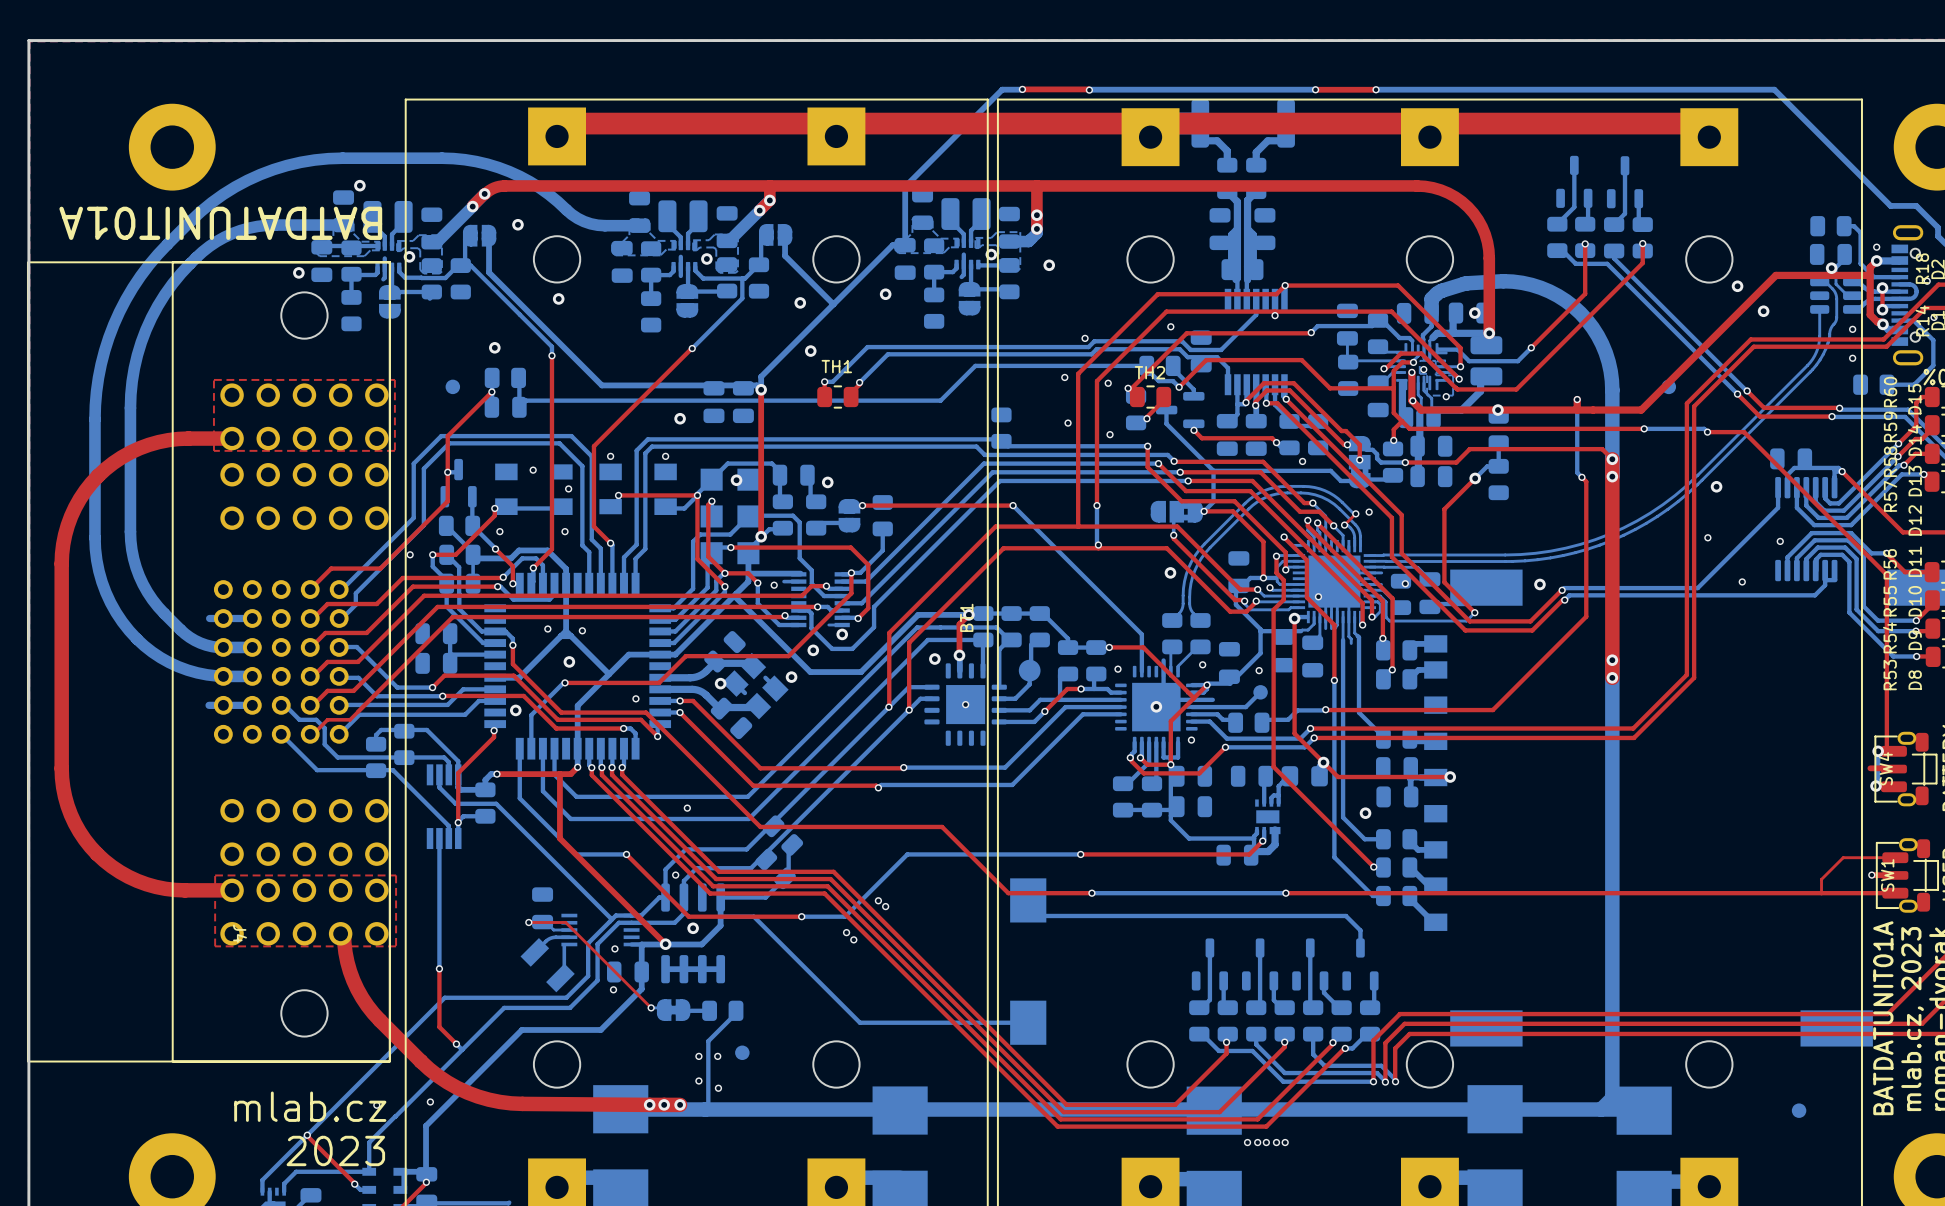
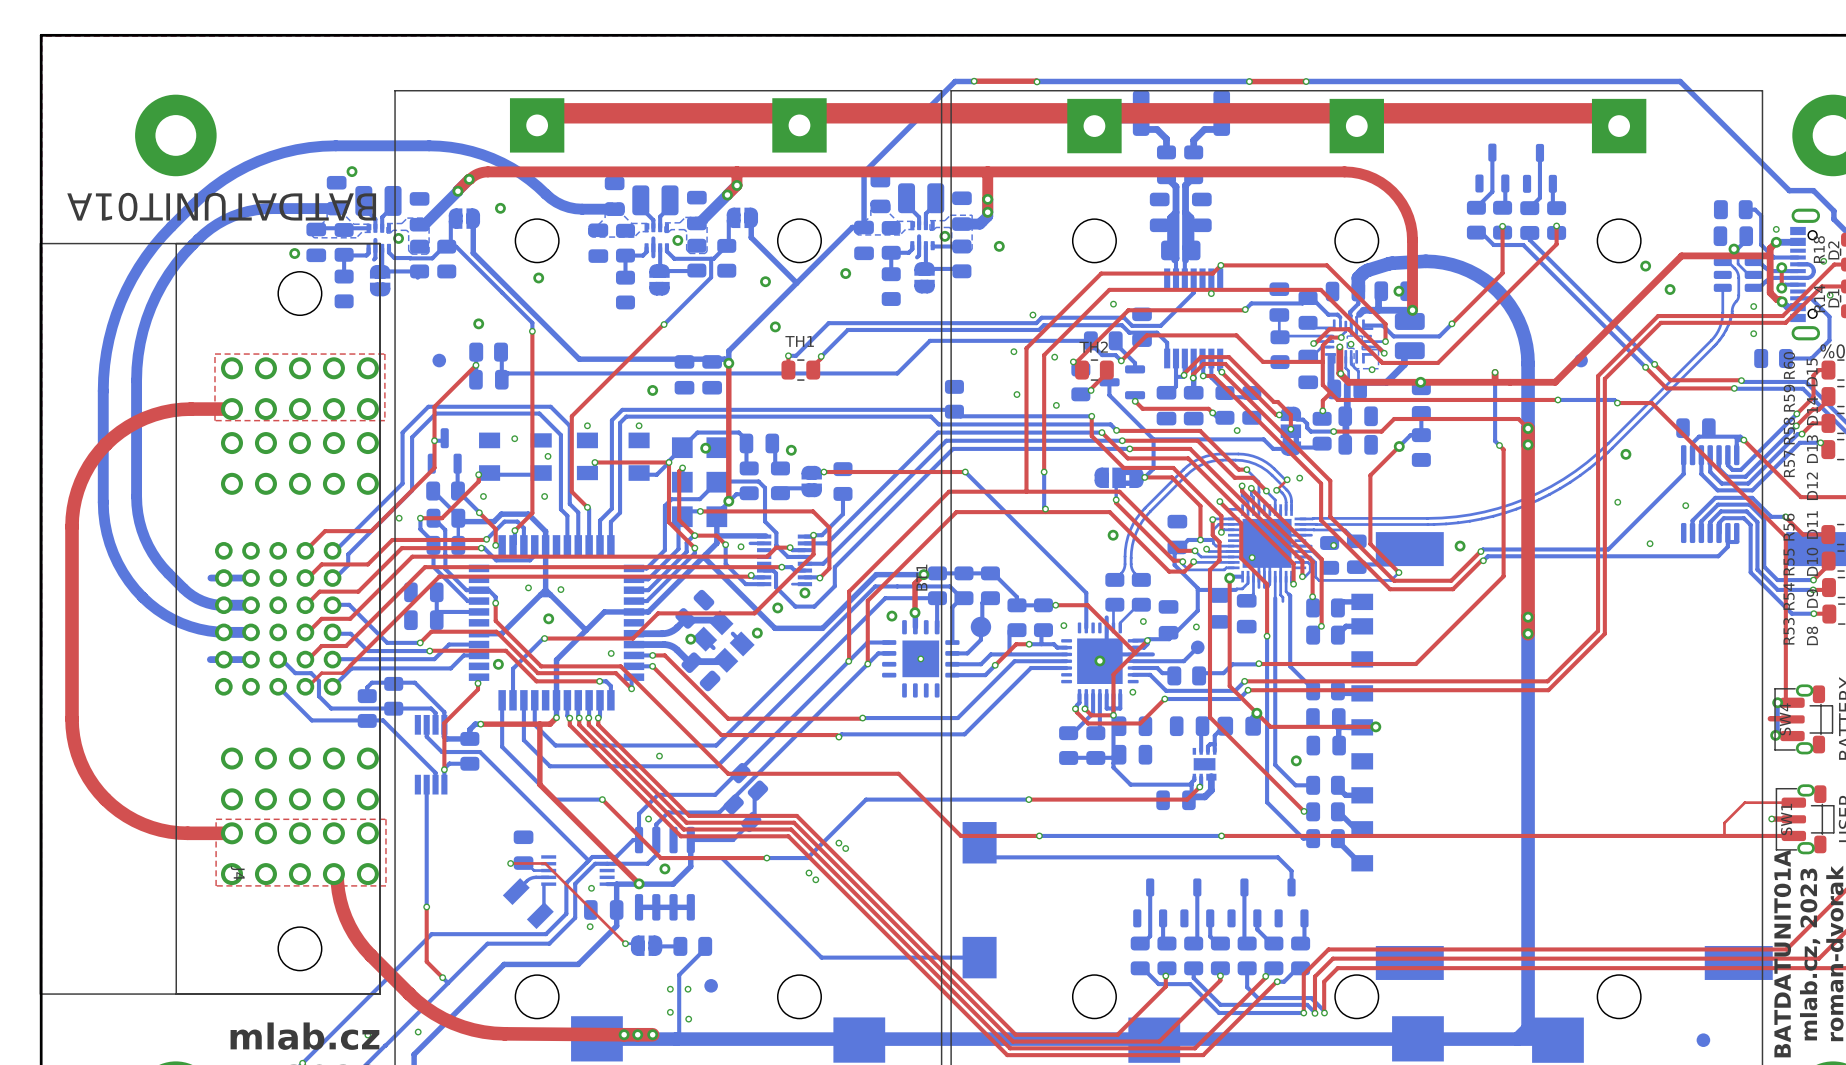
part footprint: [656, 999, 691, 1021] -> [630, 935, 663, 956]

